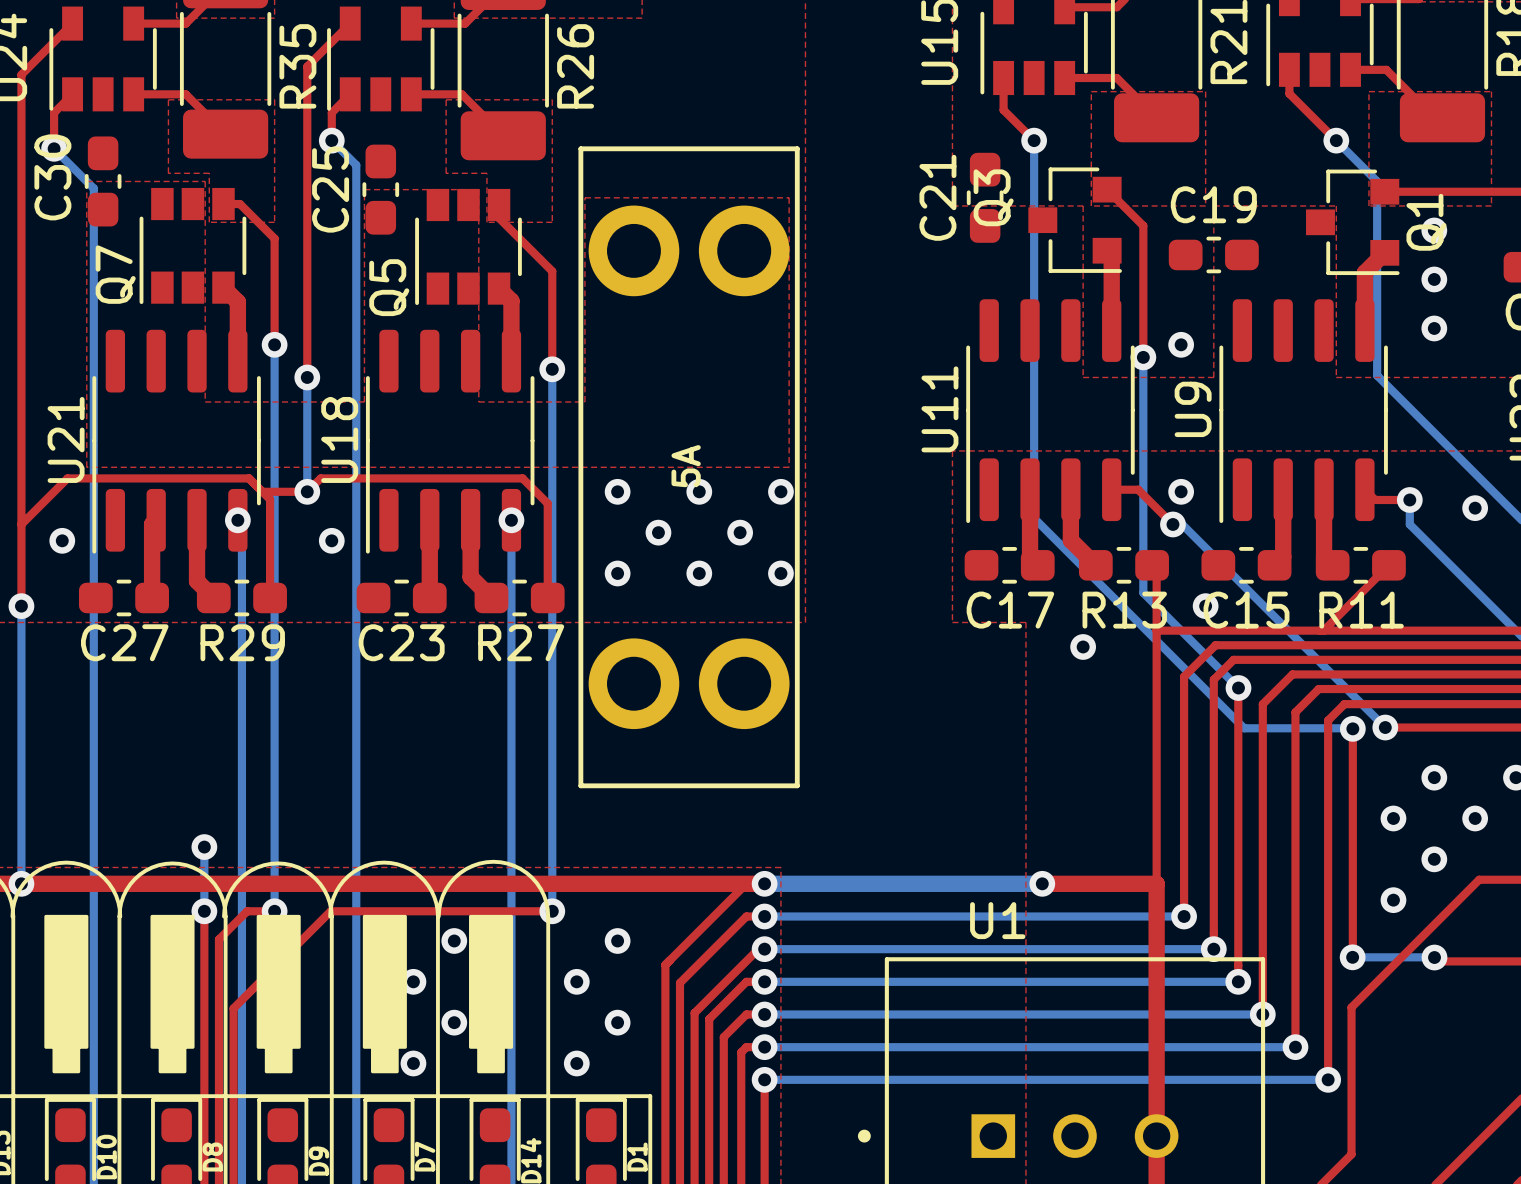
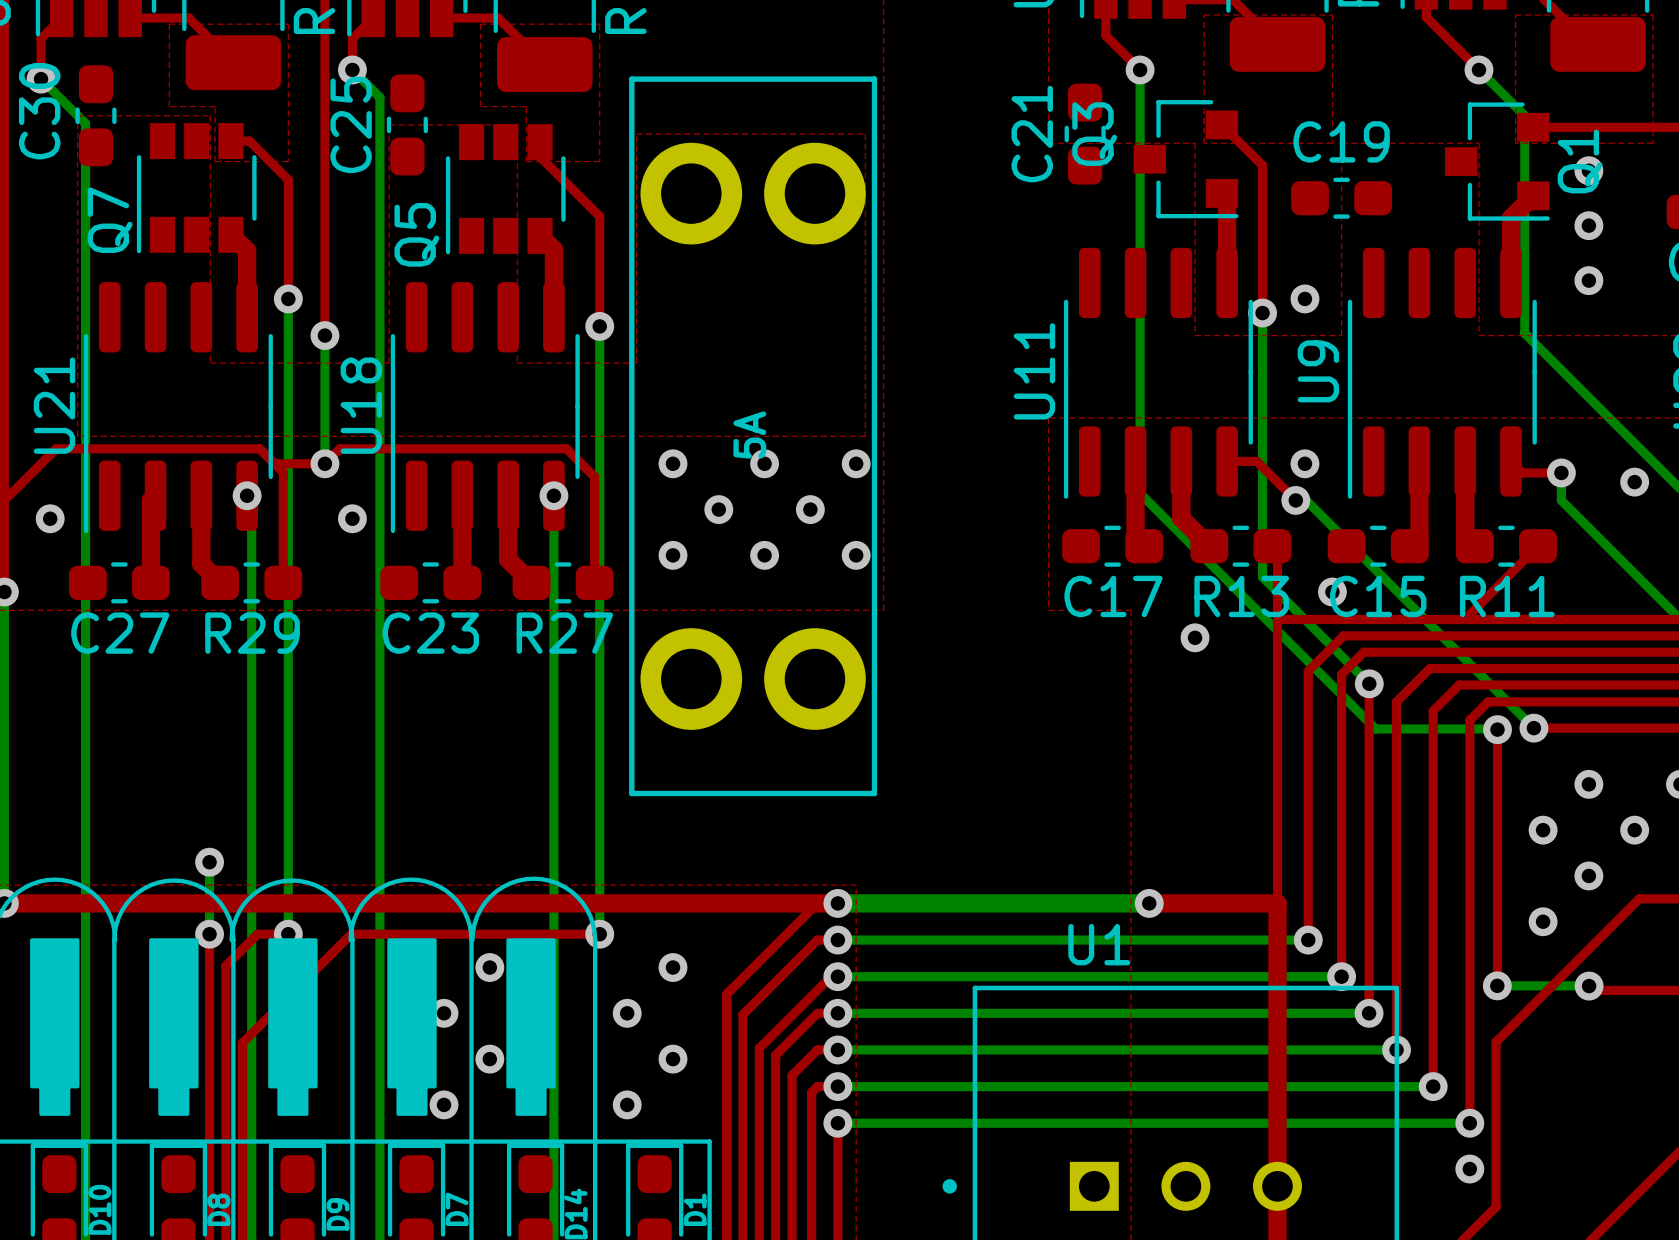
via: none -> (1469, 1169)

